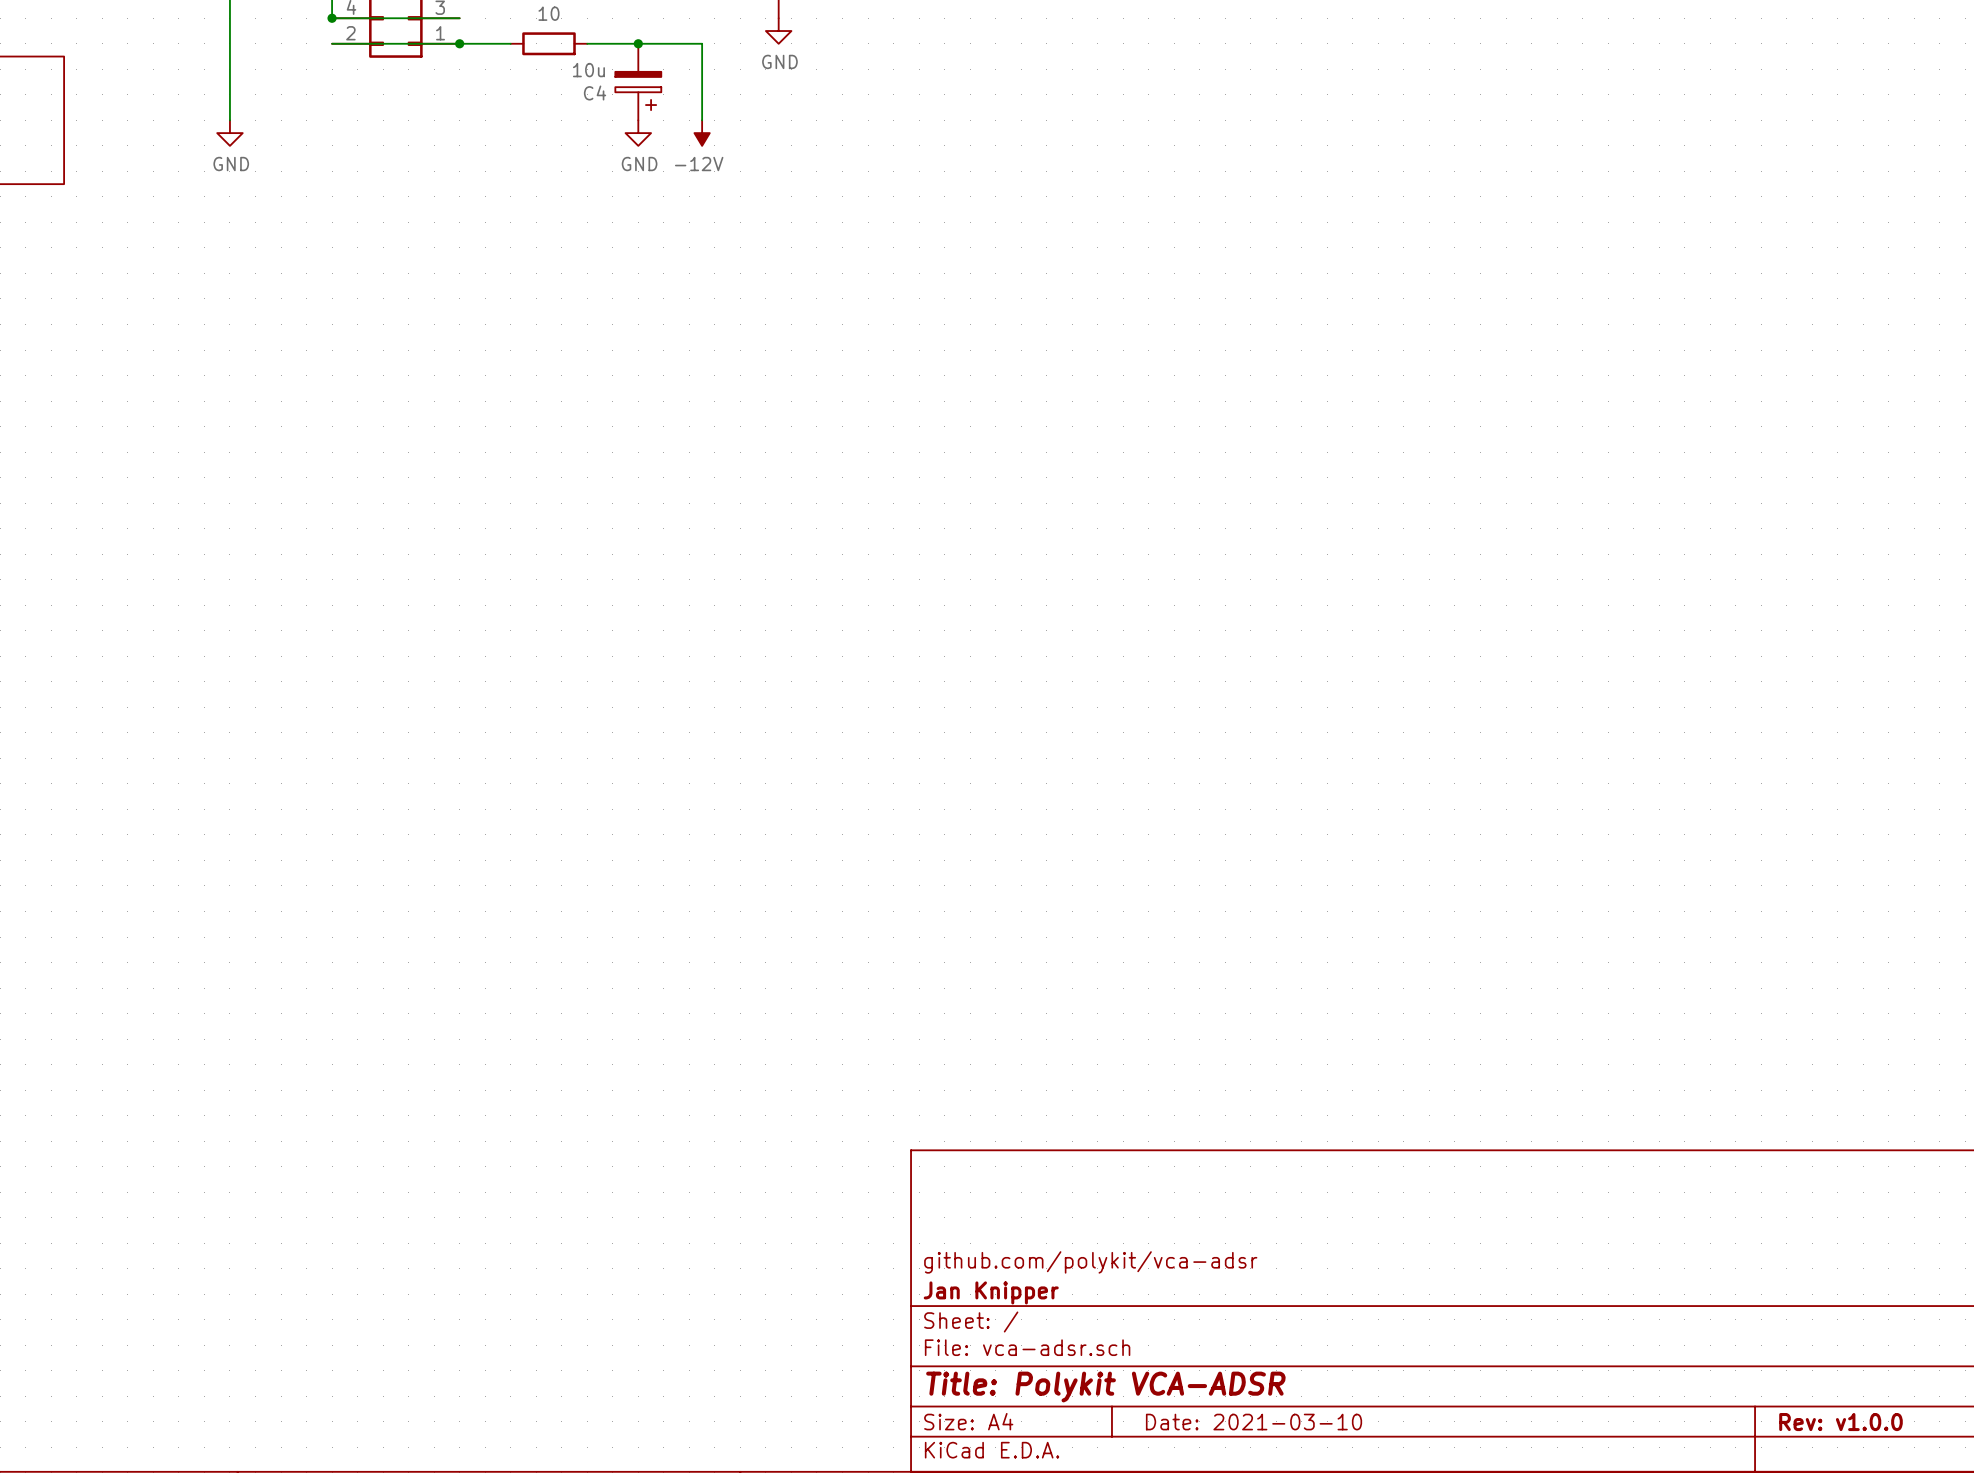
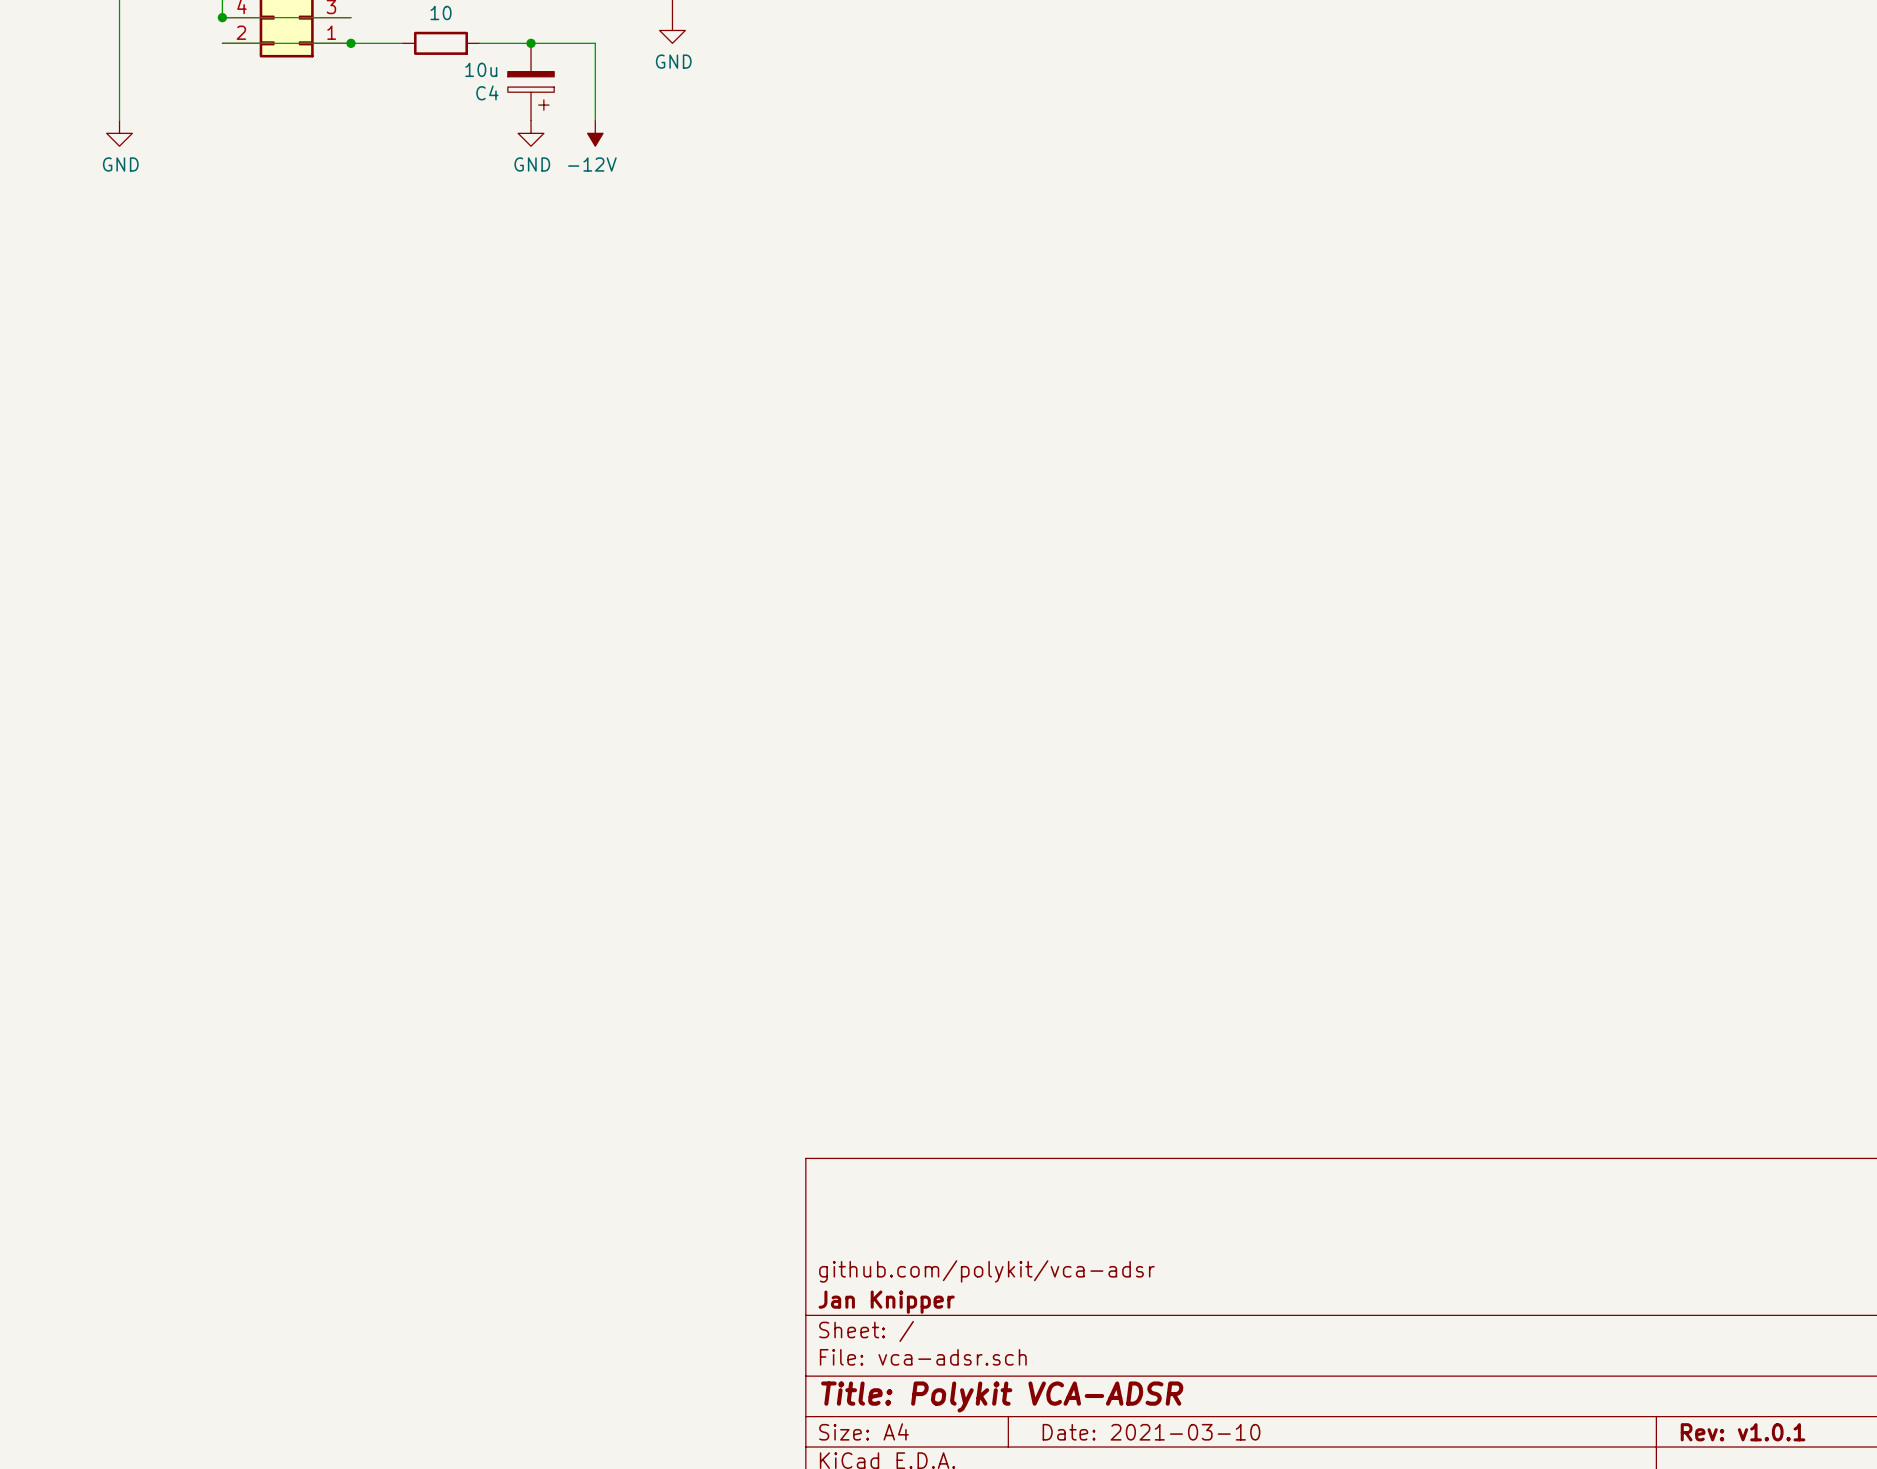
title block: Rev: v1.0.0 (1840, 1422) -> Rev: v1.0.1 (1743, 1432)

